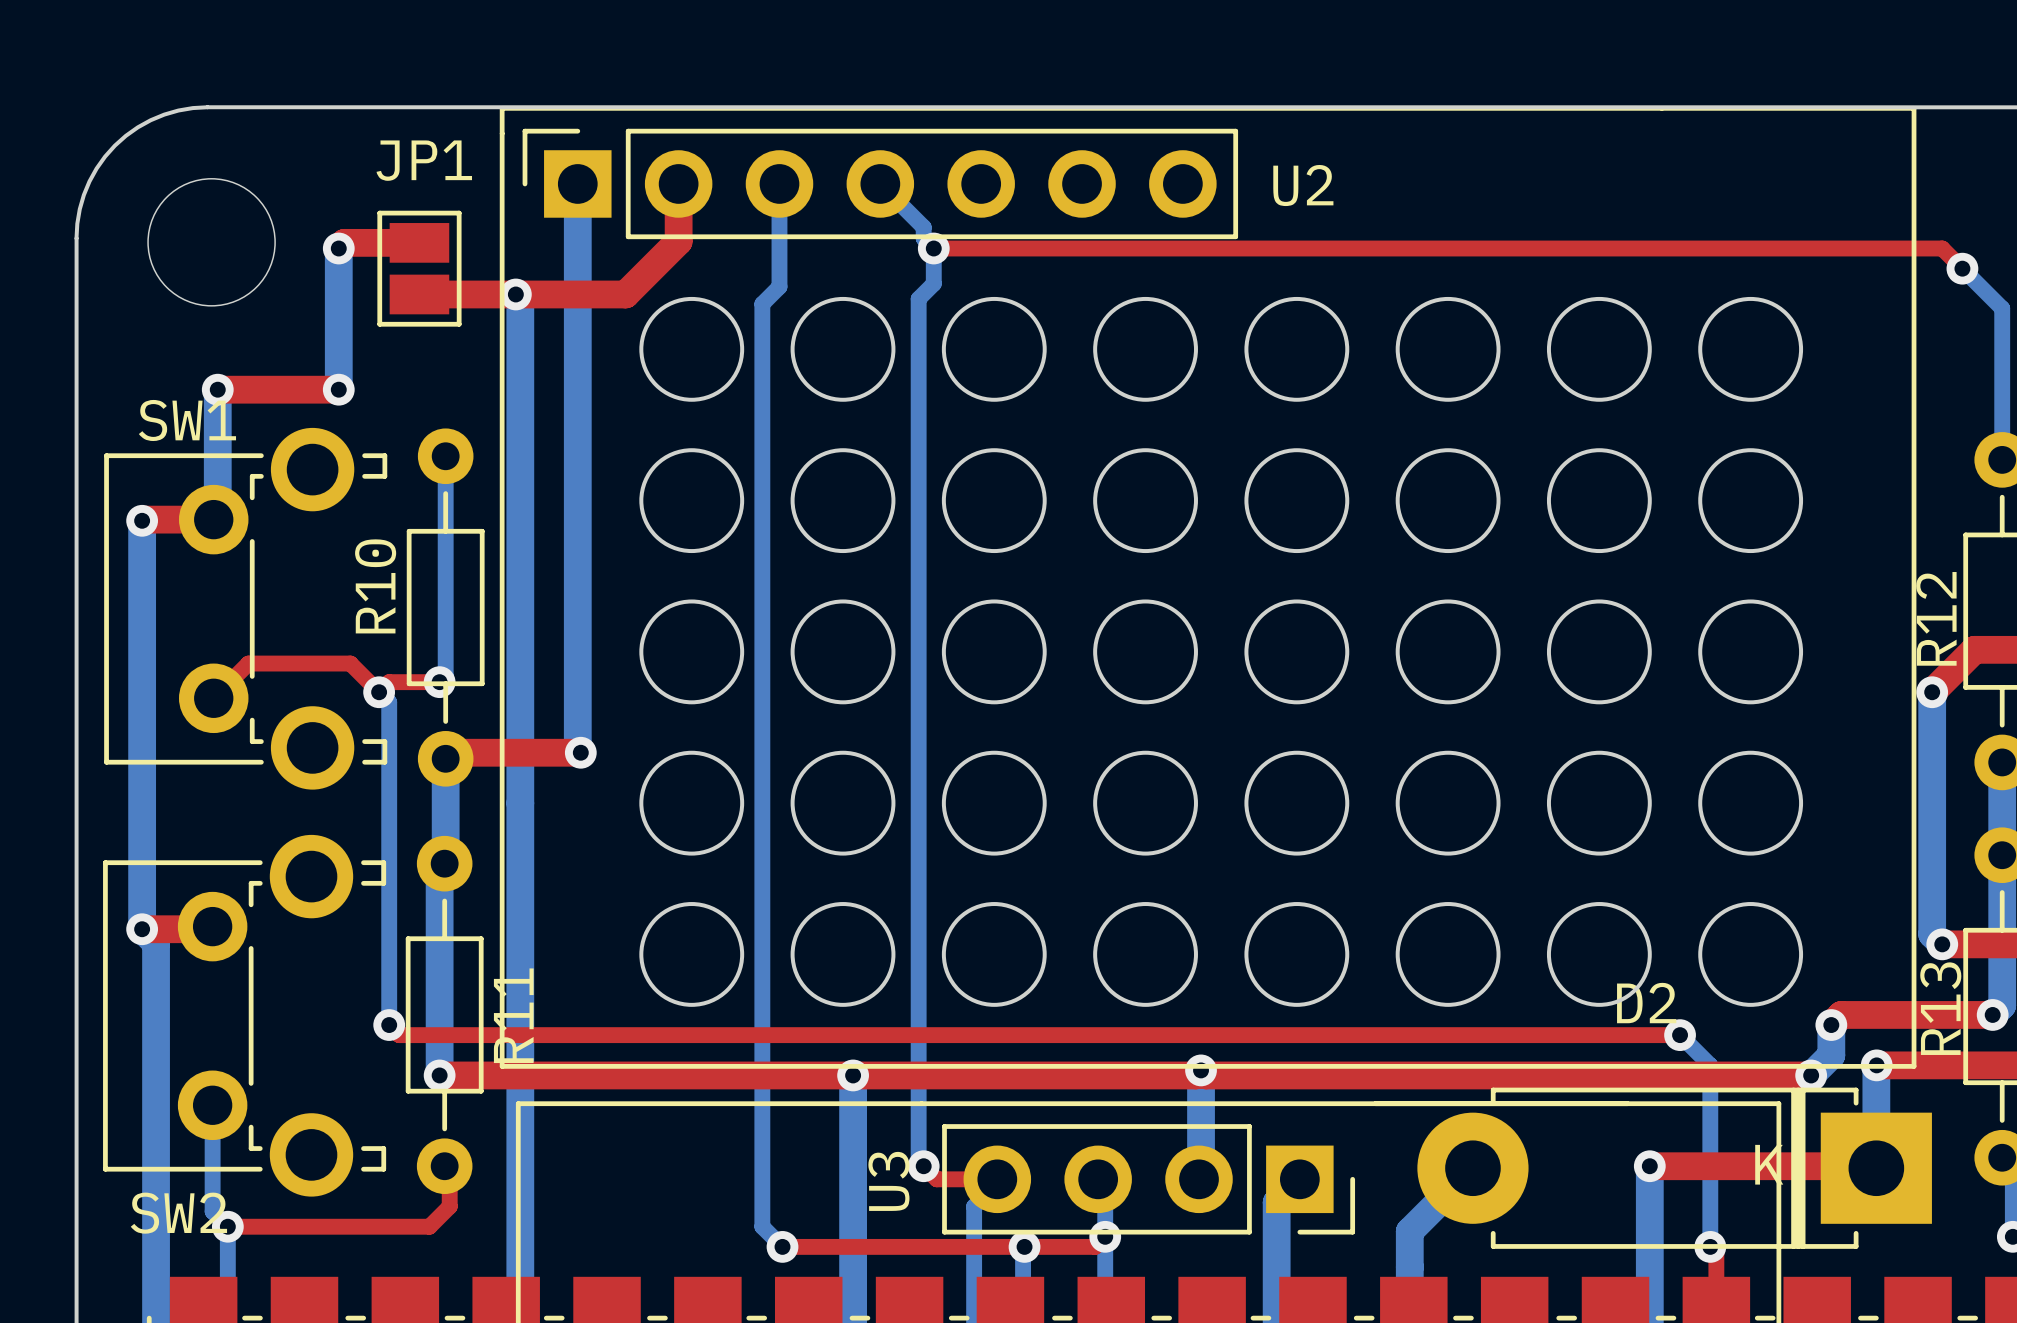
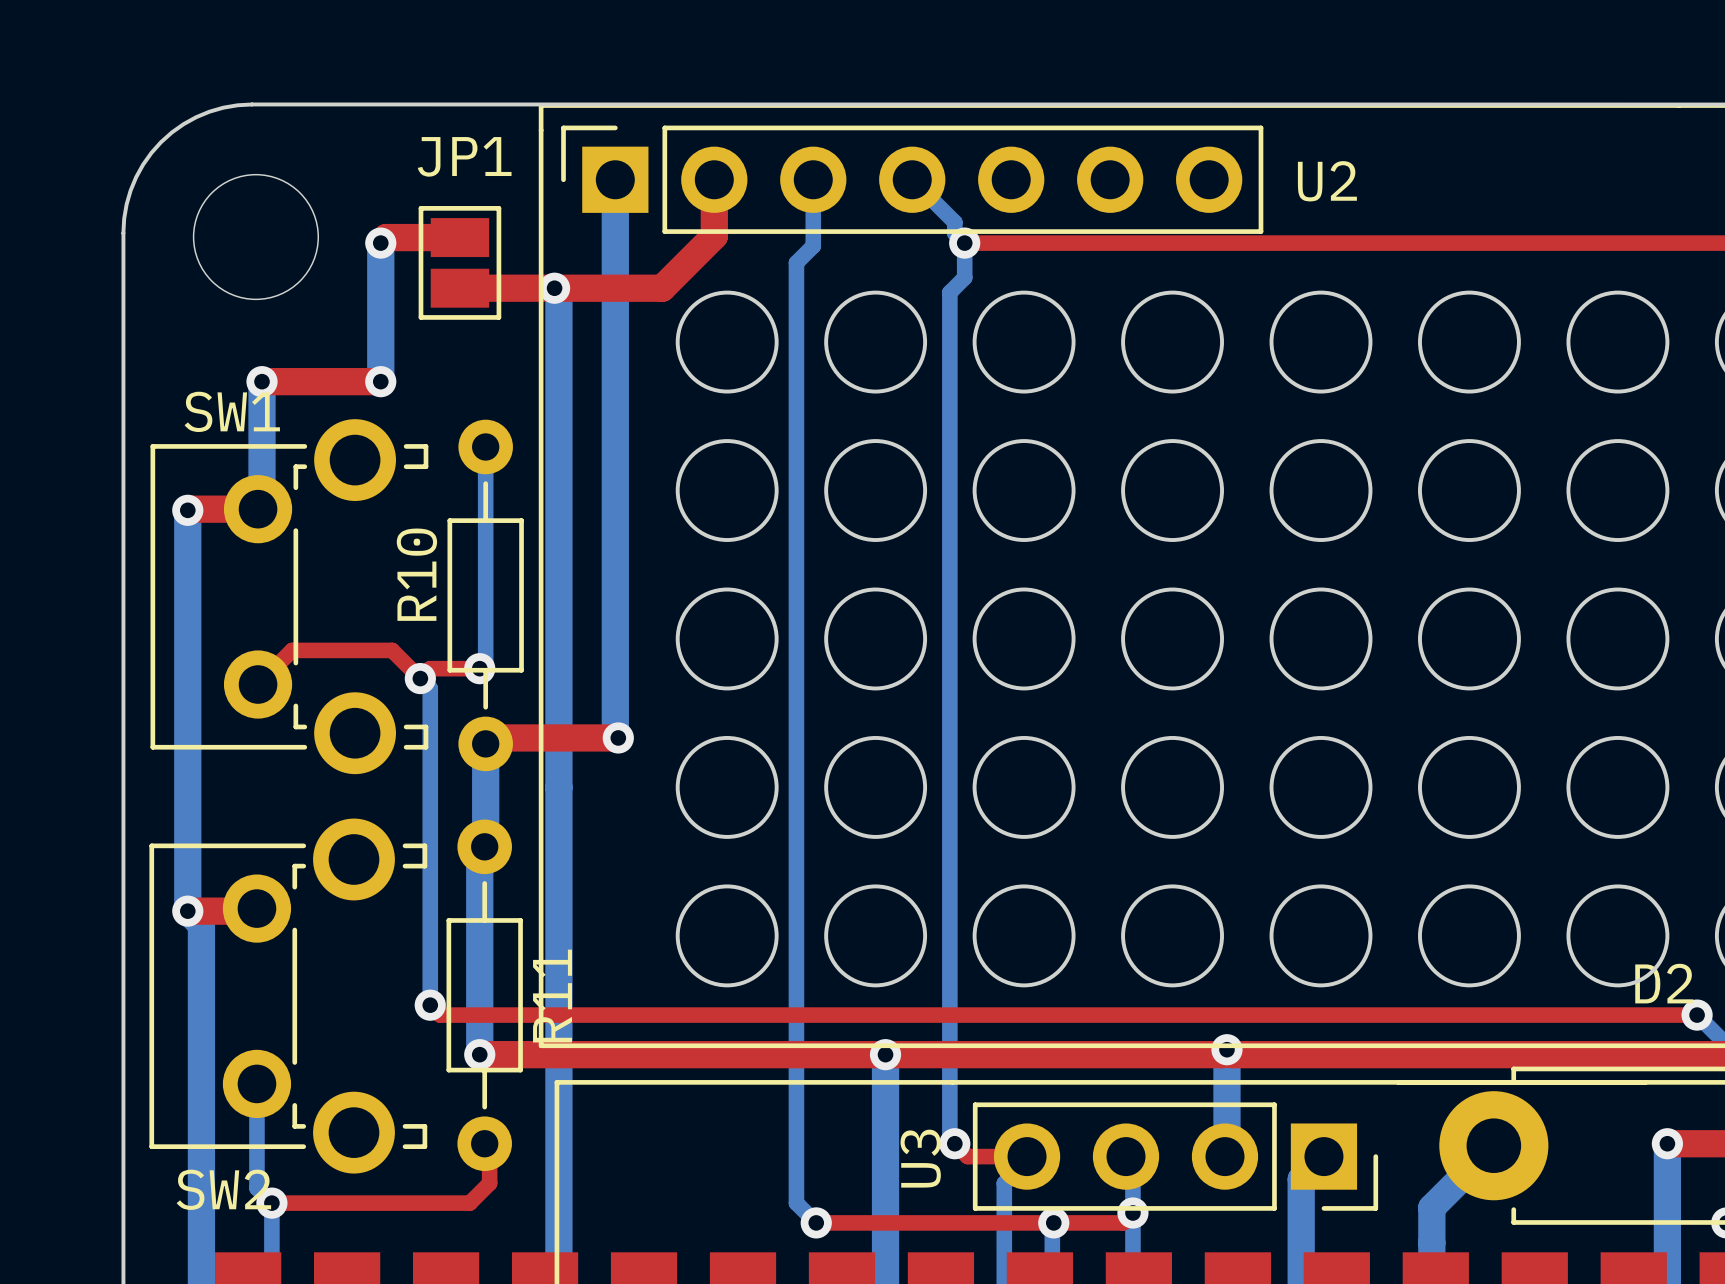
bottom track: (779, 251) (779, 286) (762, 303) -> (813, 246) (796, 262) (796, 297)

